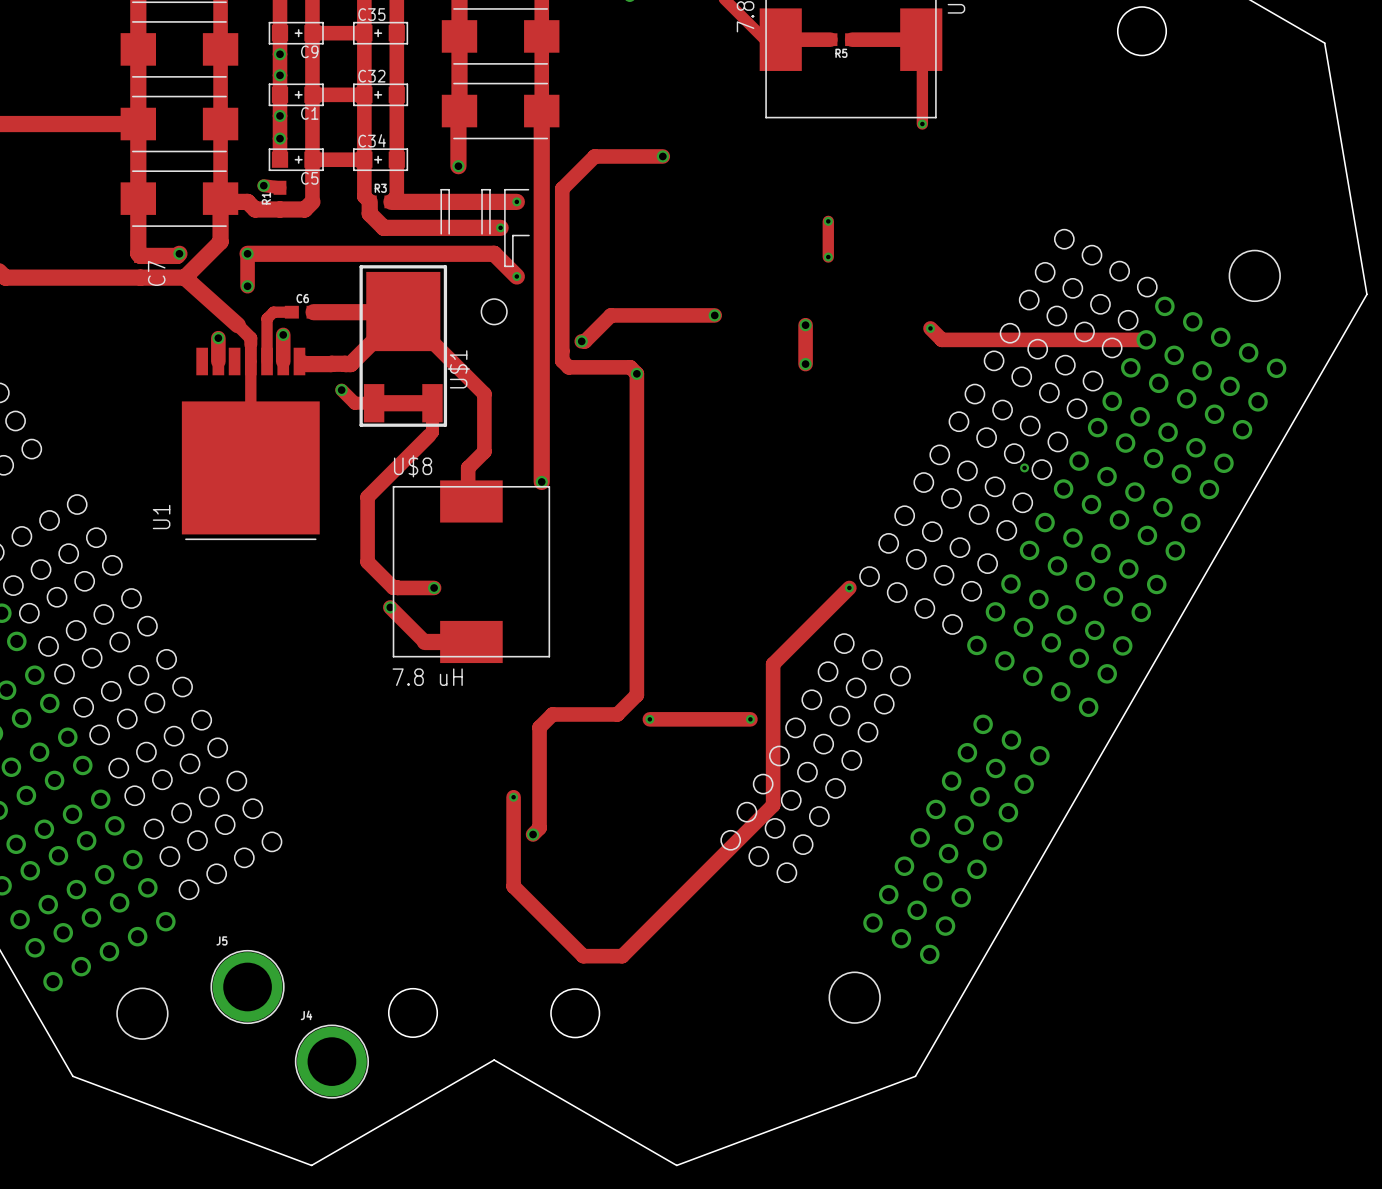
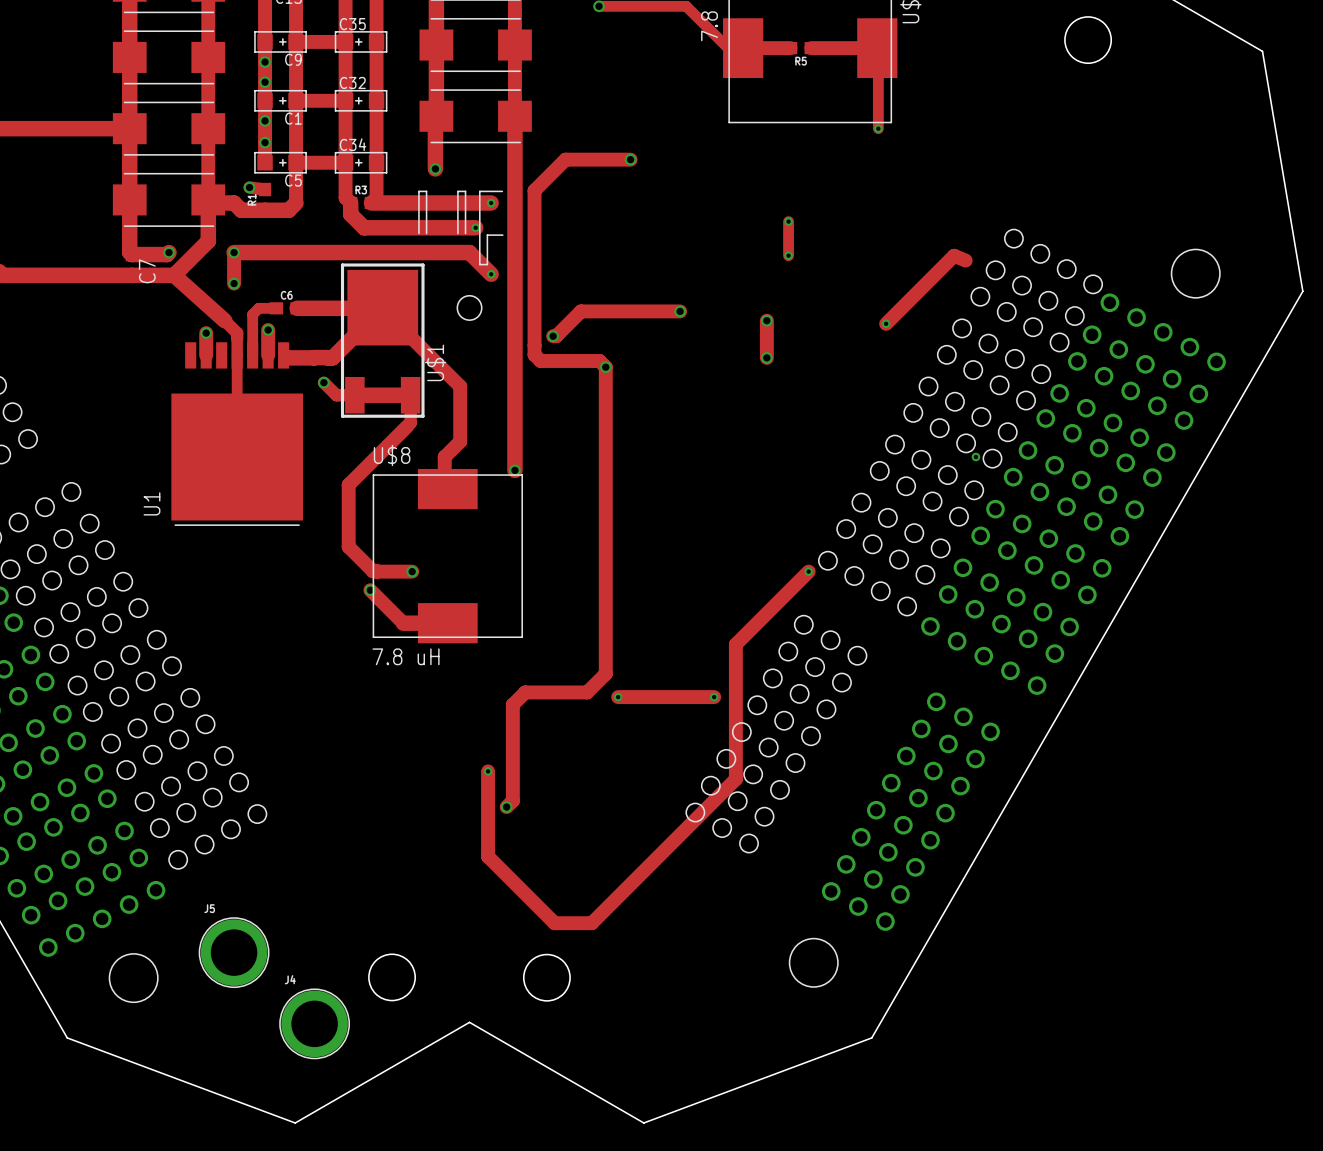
track: (930, 328) (941, 339) (1146, 339) -> (886, 323) (954, 255) (965, 260)

